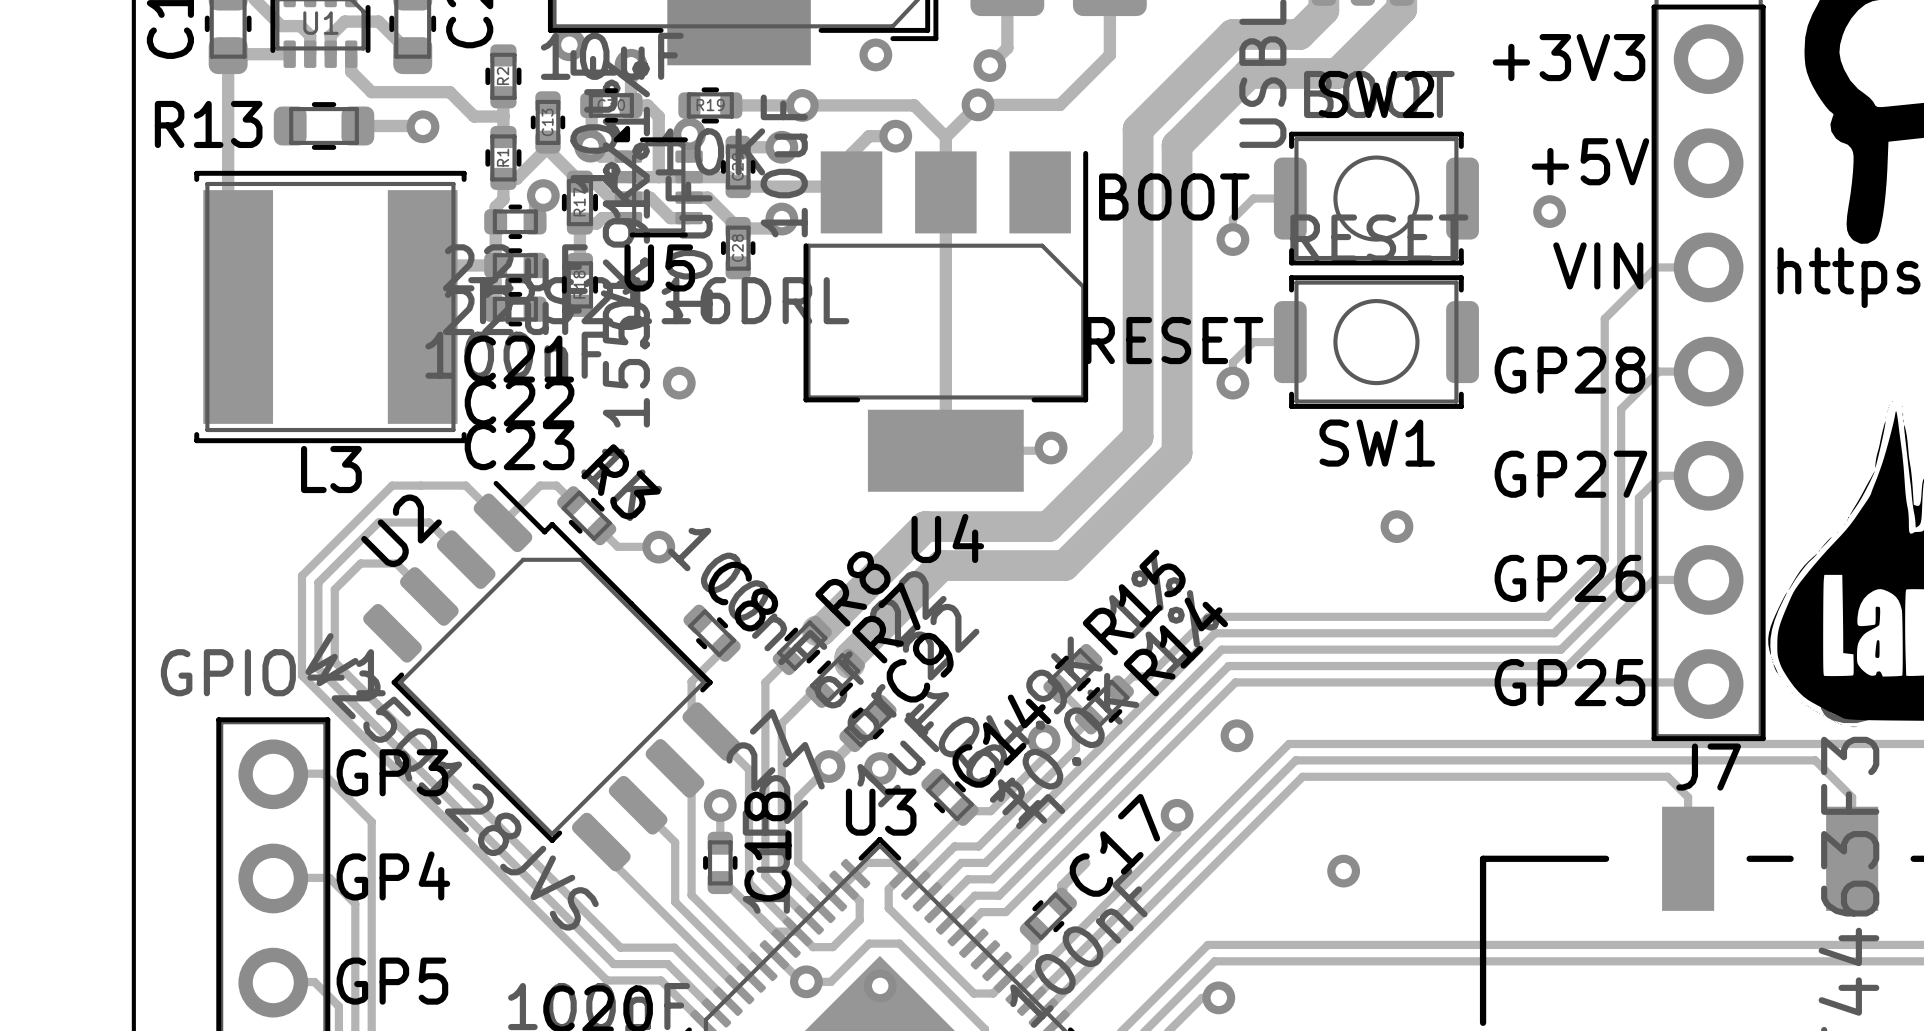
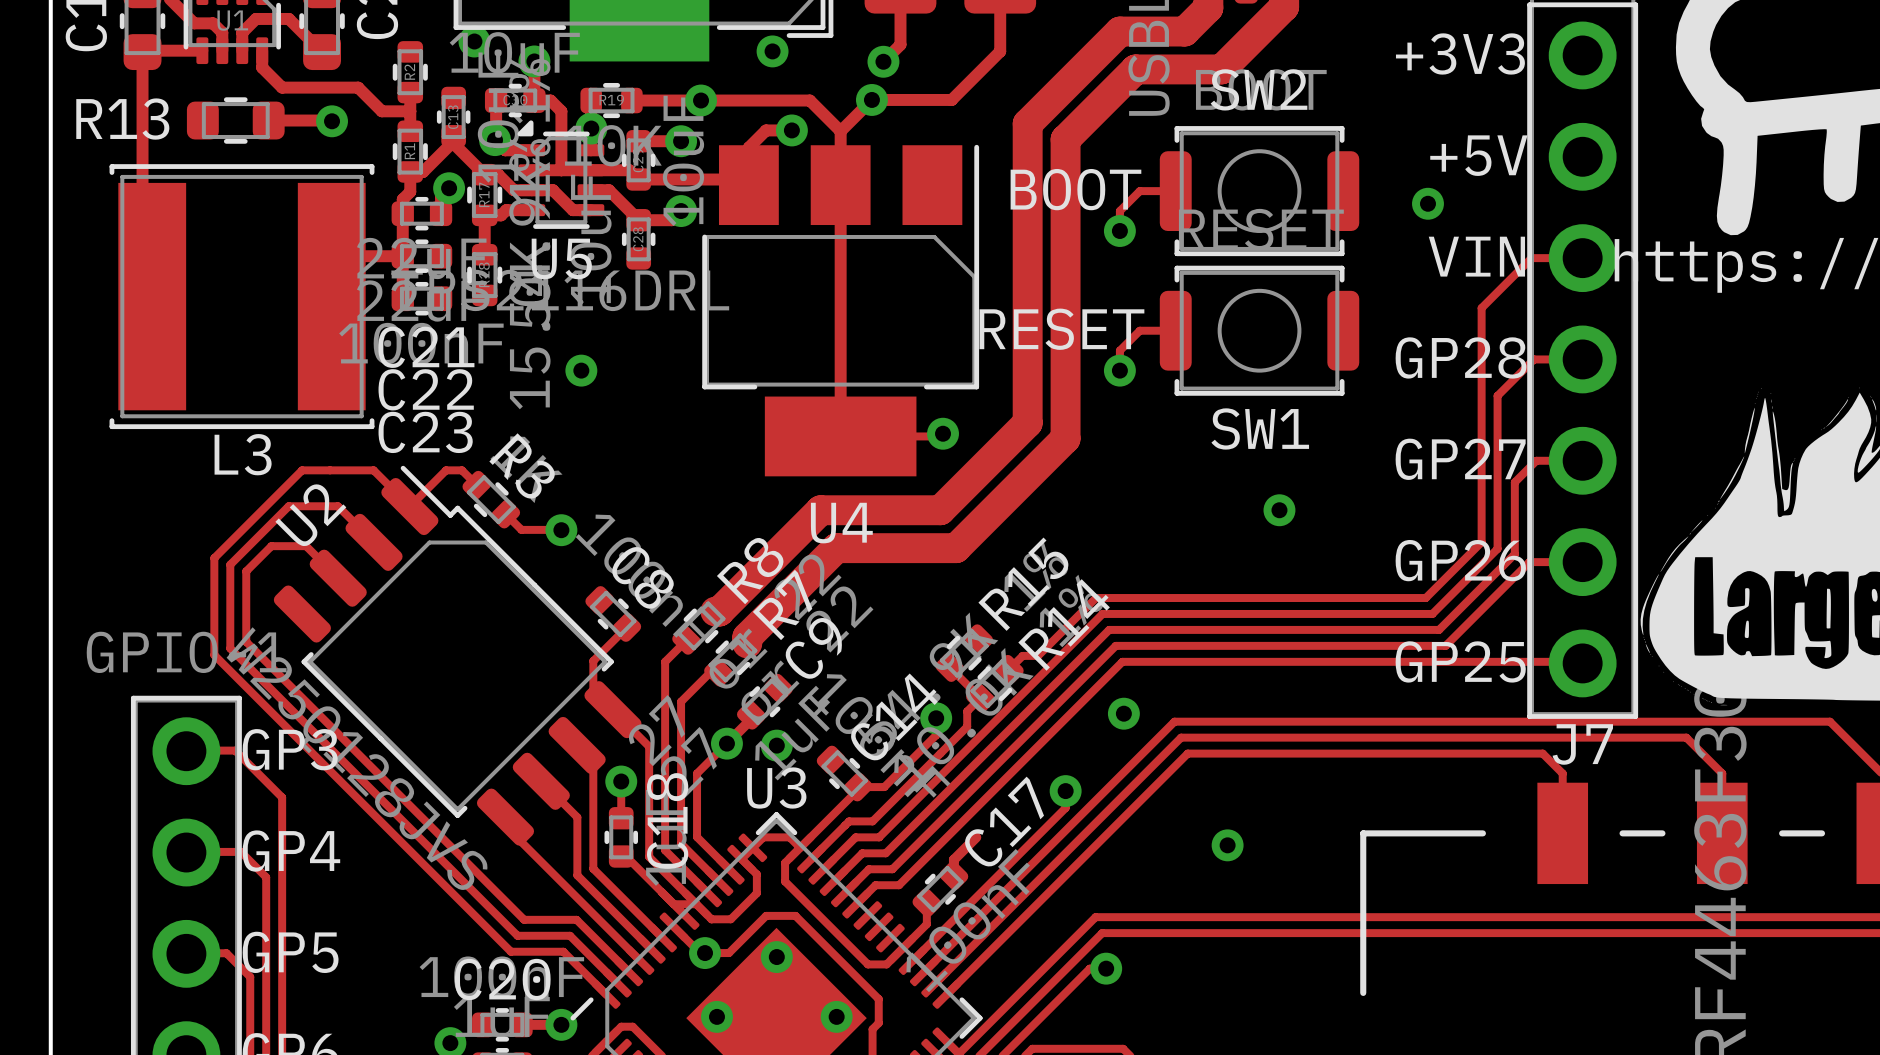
text position: BOOT (1174, 197) -> BOOT (1075, 189)

